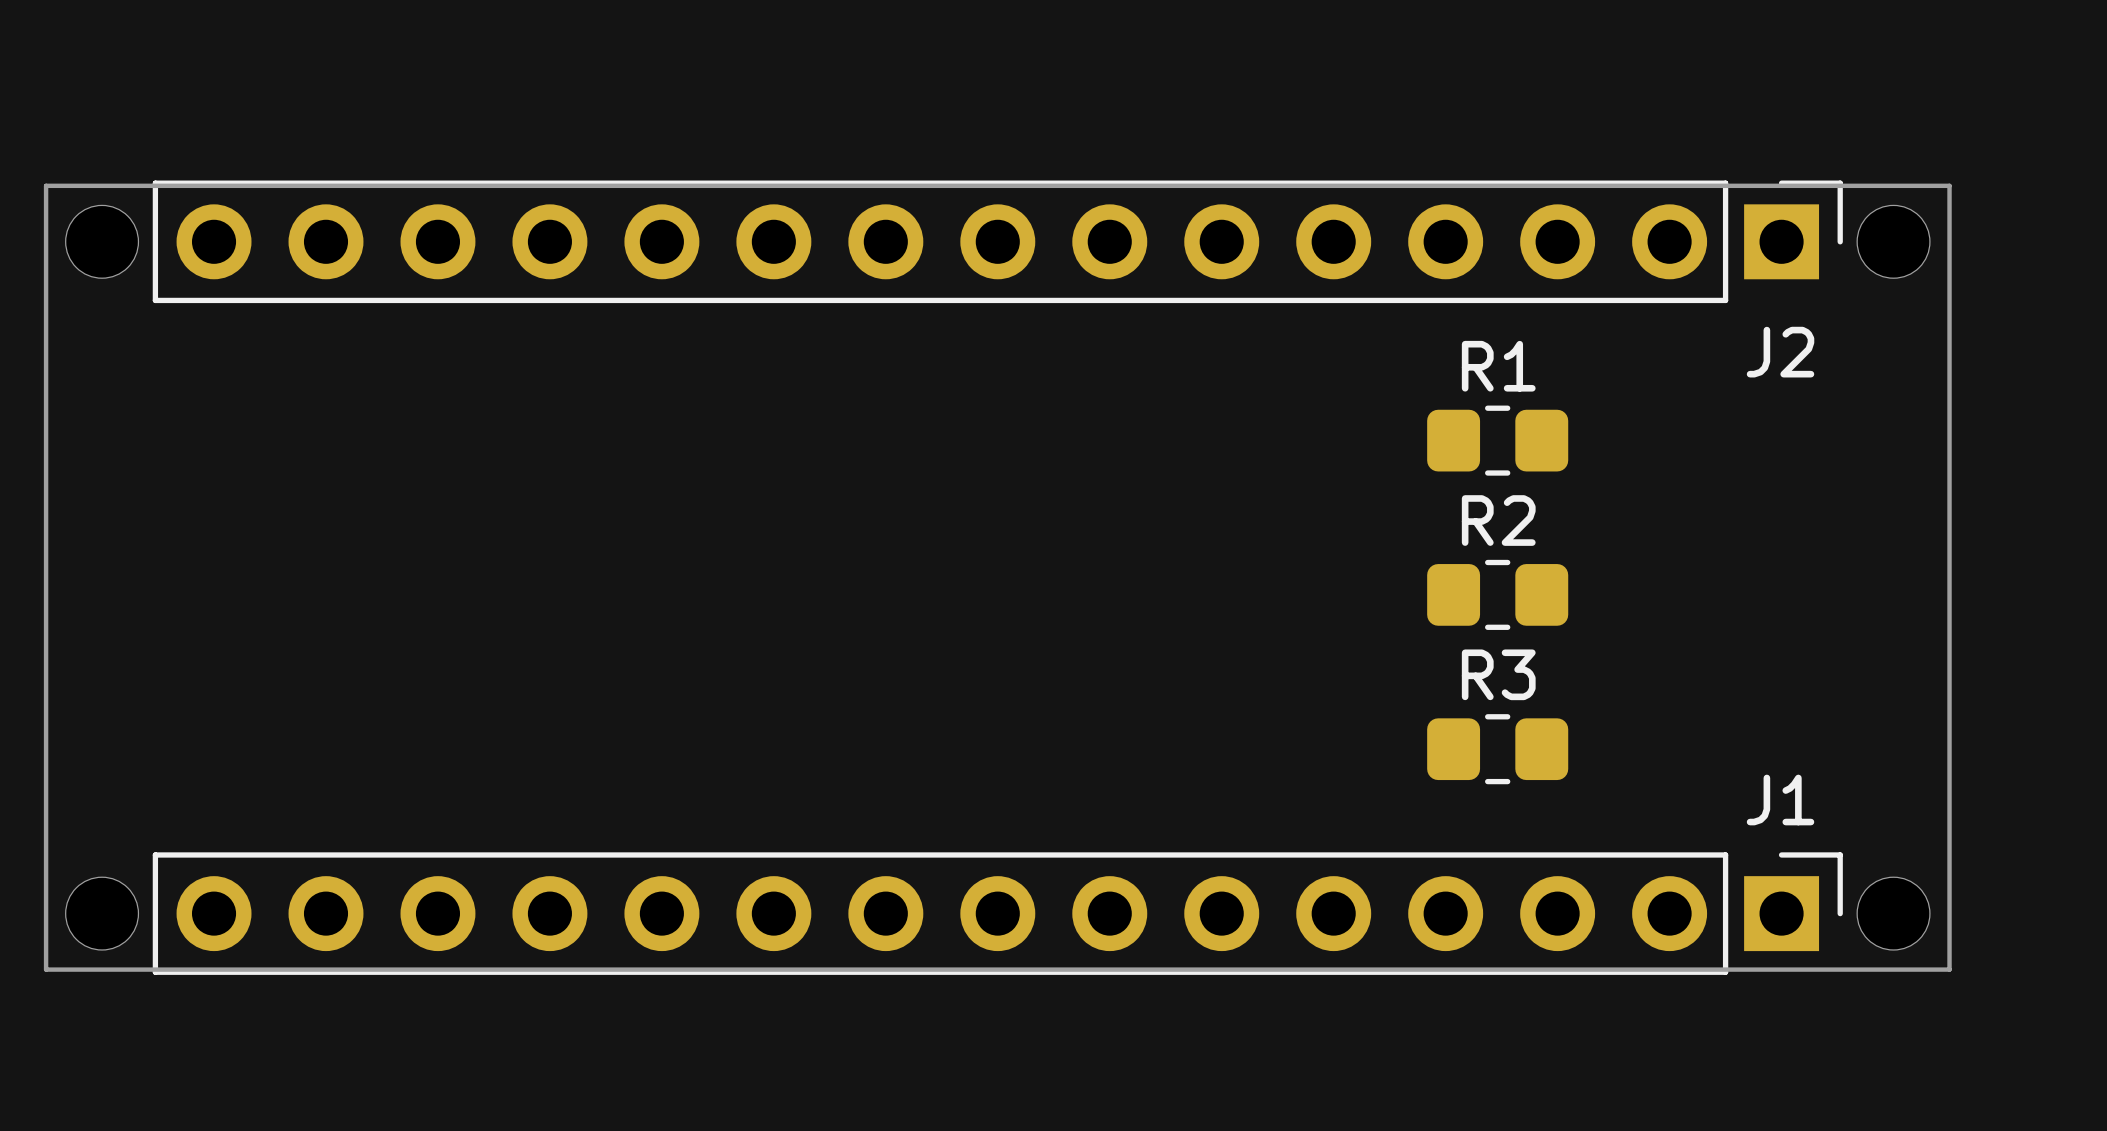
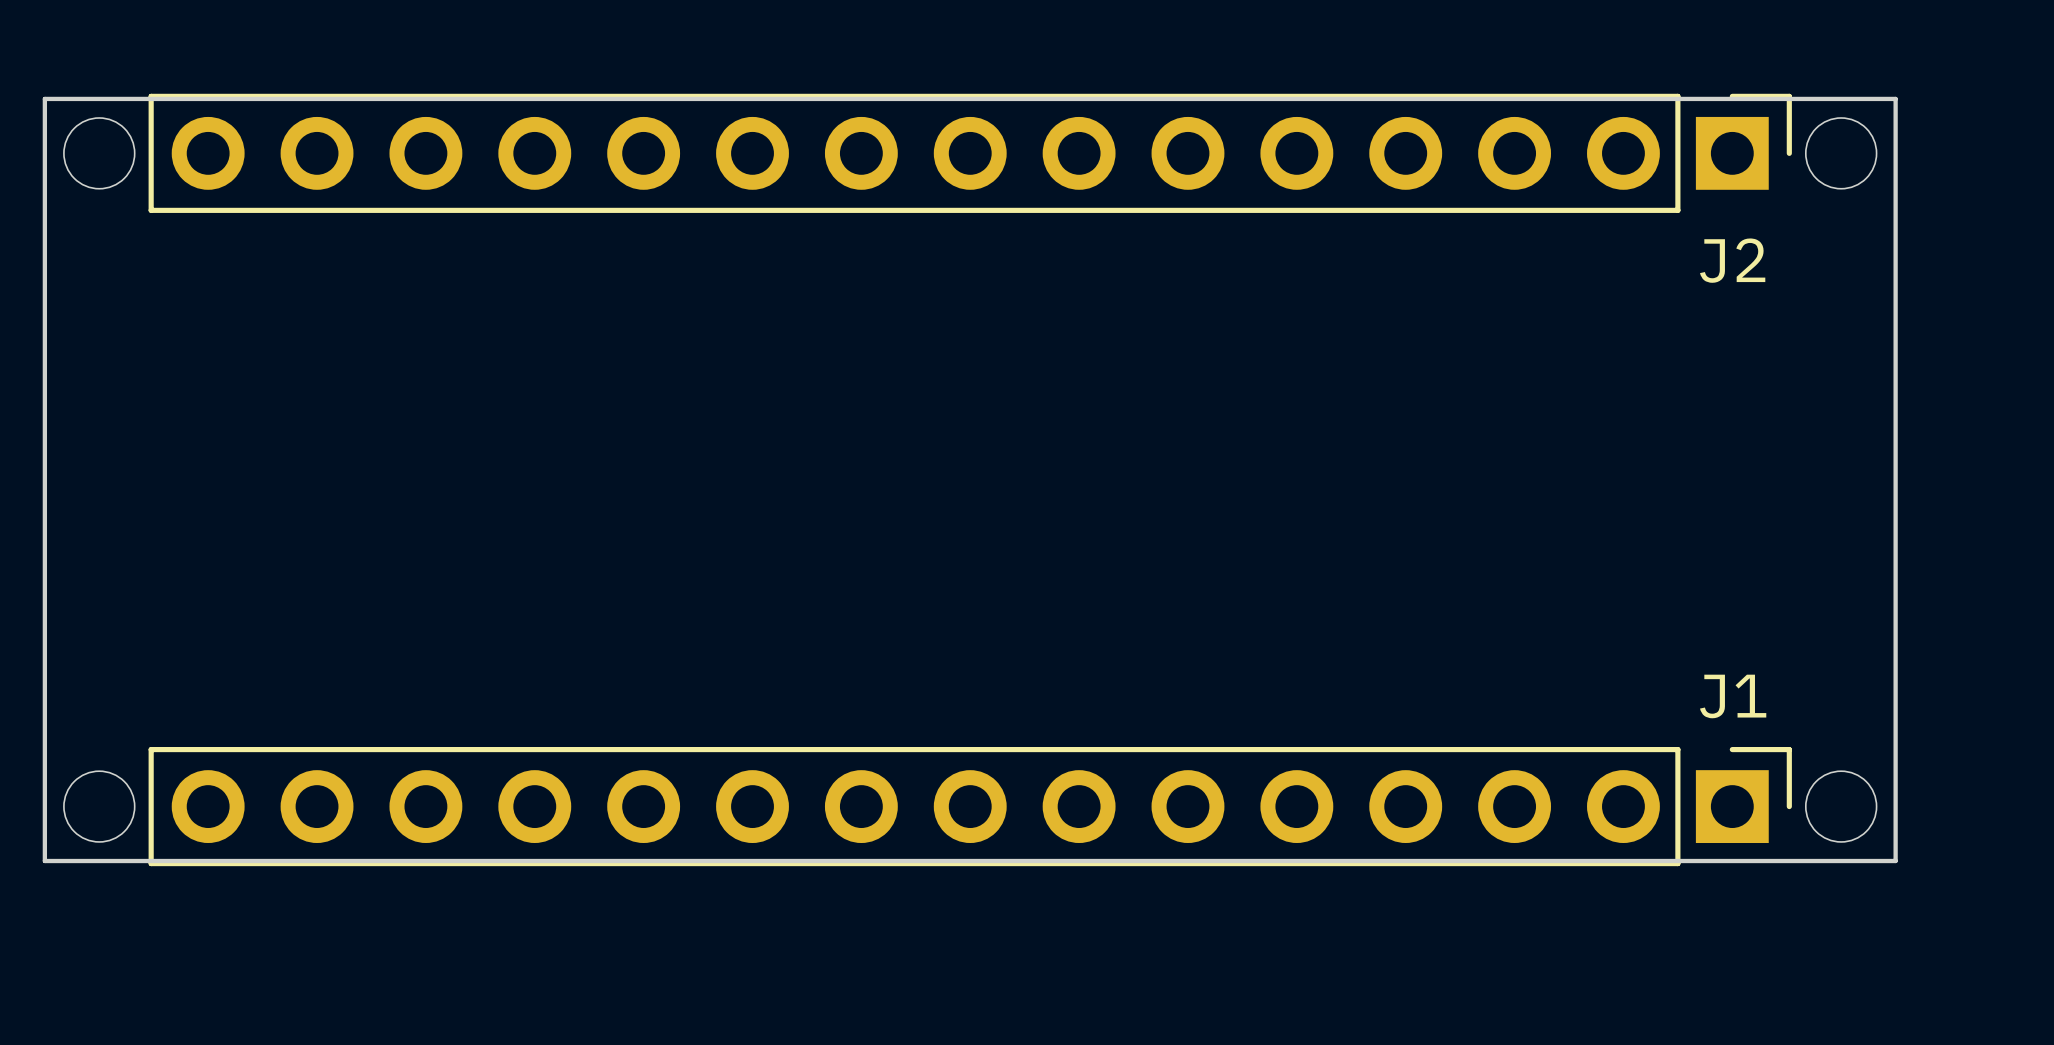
R1: (1497, 440) -> none
R2: (1497, 594) -> none
R3: (1497, 749) -> none

